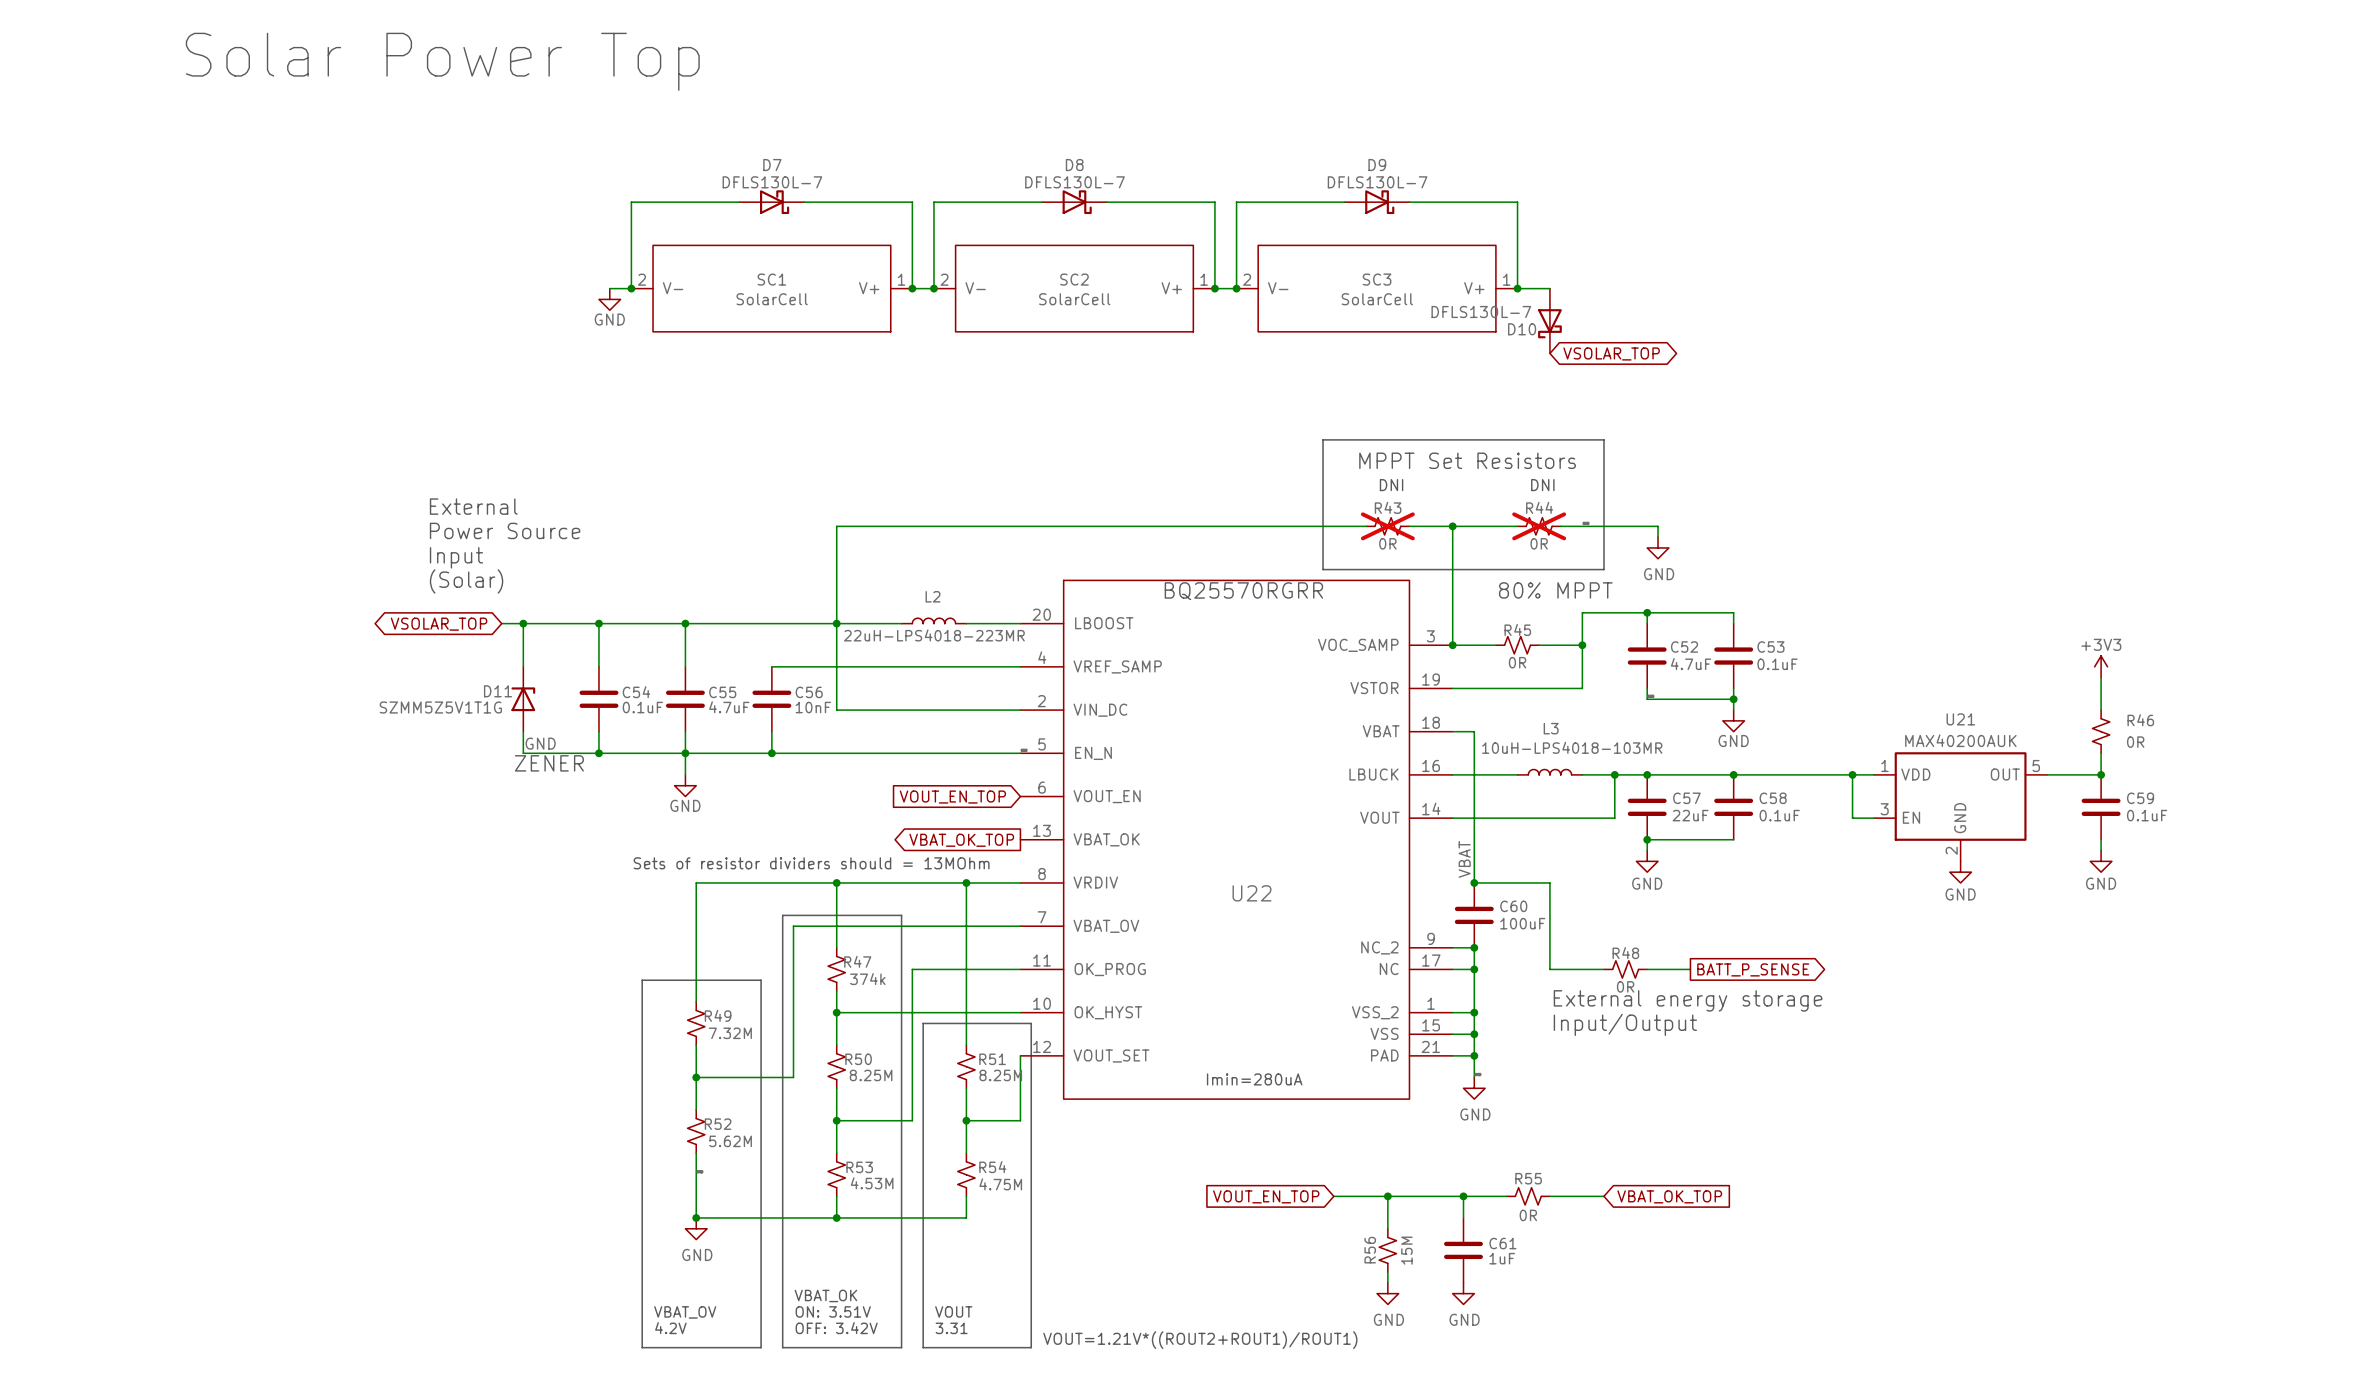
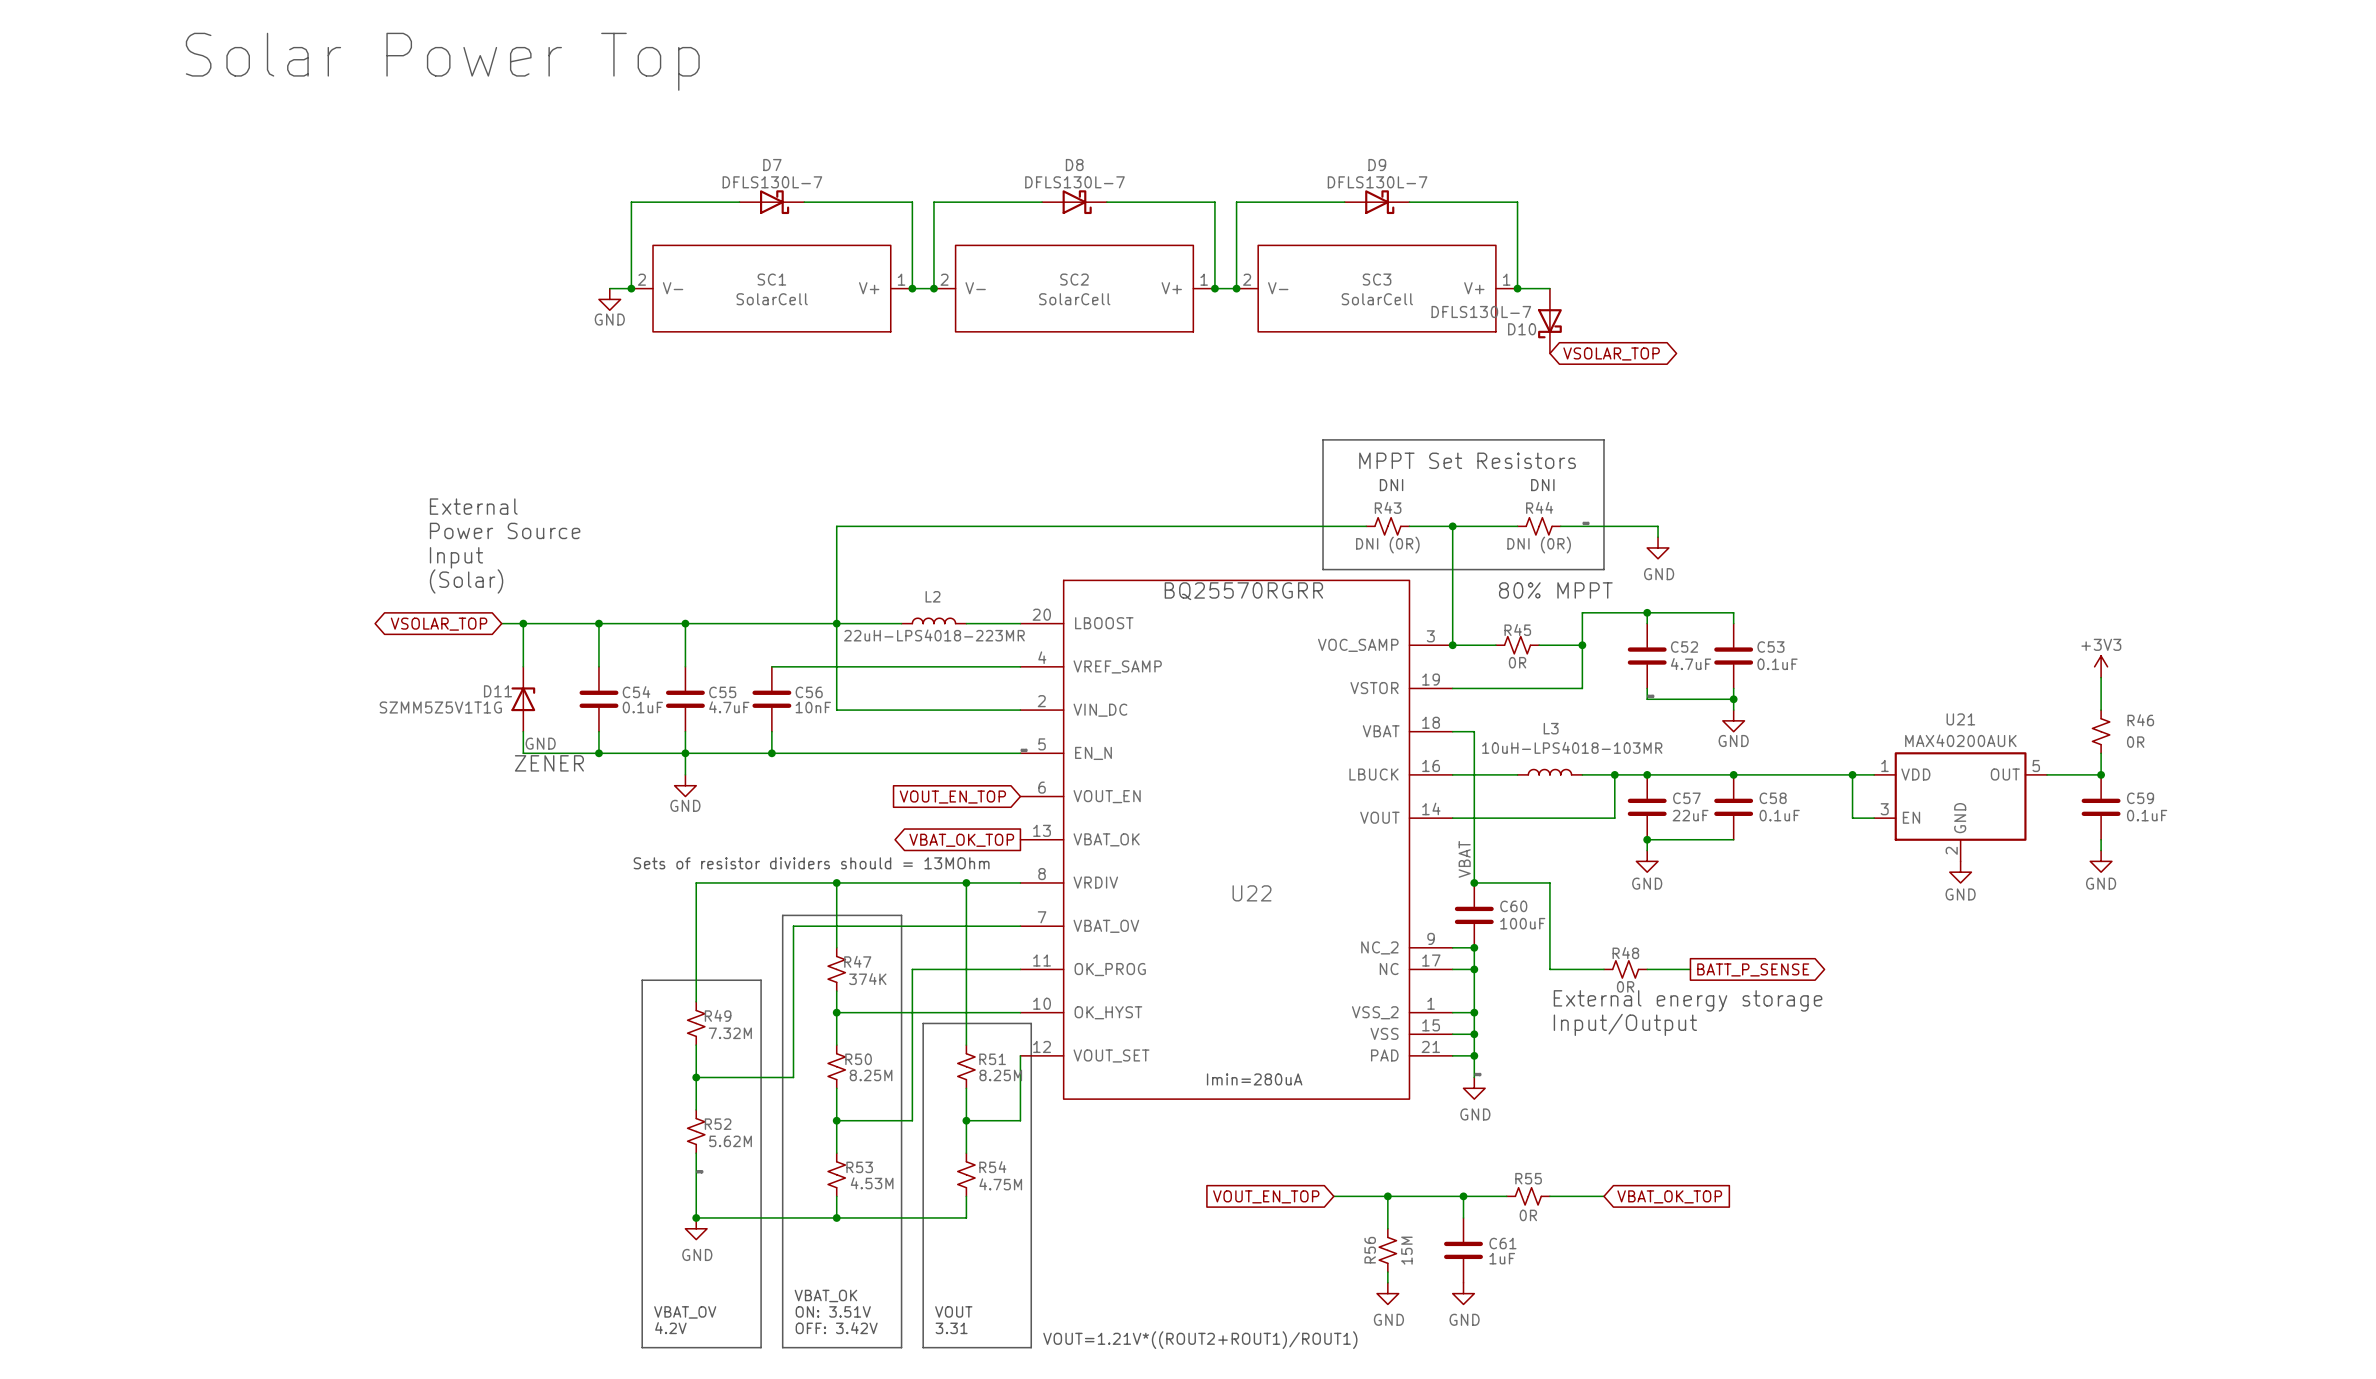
R43 do-not-place cross: (1387, 526) -> none
R44 do-not-place cross: (1539, 526) -> none
R43 value: 0R (1387, 543) -> DNI (0R) (1387, 545)
R44 value: 0R (1539, 543) -> DNI (0R) (1539, 545)
R47 value: 374k (867, 979) -> 374K (867, 979)

